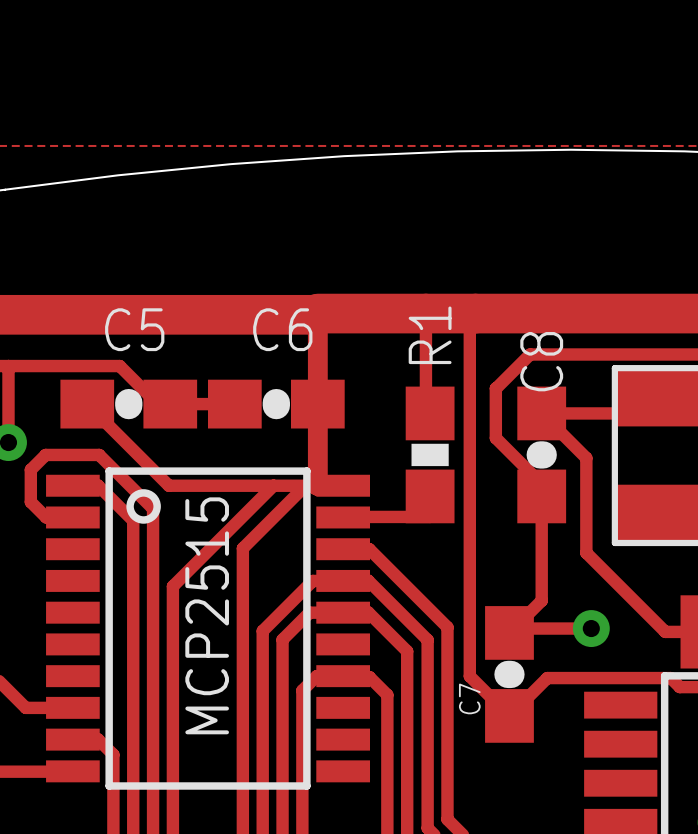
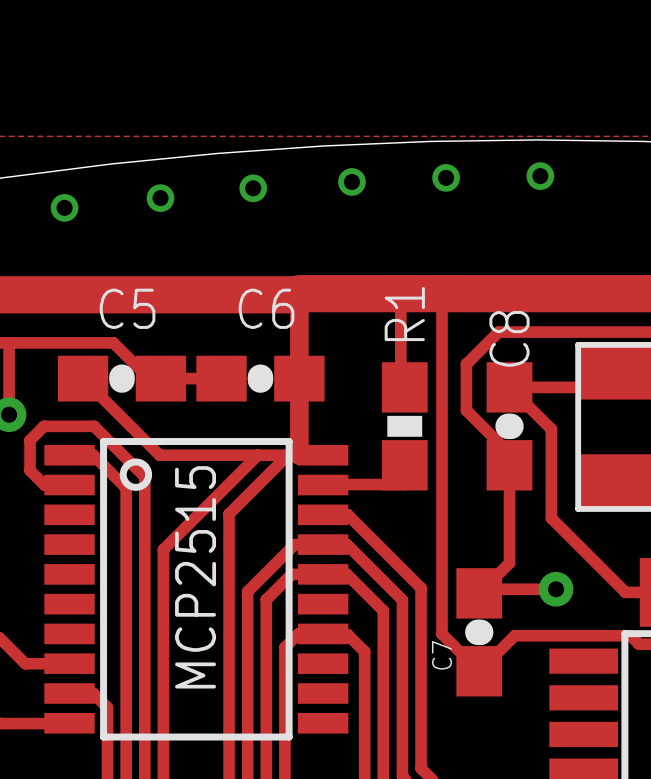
via: none -> (540, 176)
via: none -> (446, 177)
via: none -> (351, 181)
via: none -> (253, 188)
via: none -> (160, 198)
via: none -> (64, 207)

